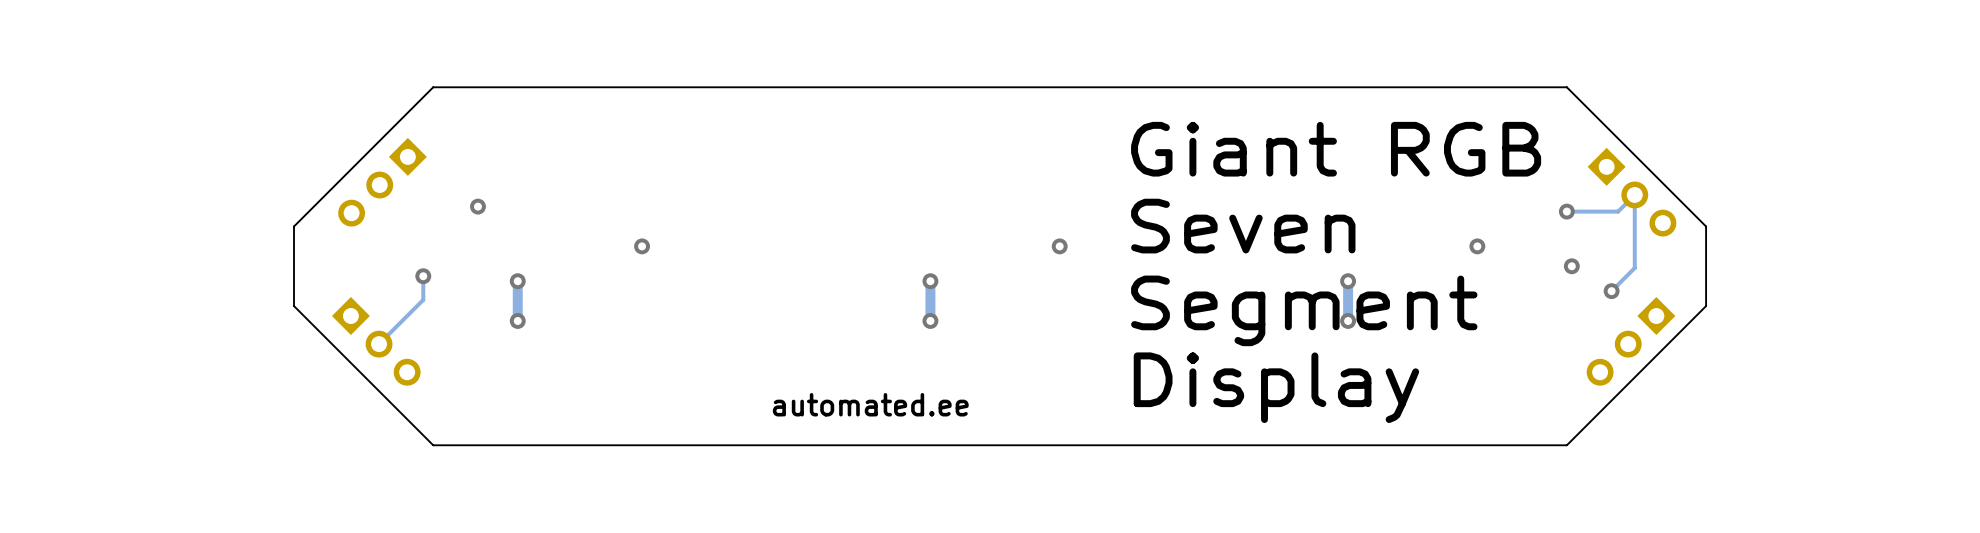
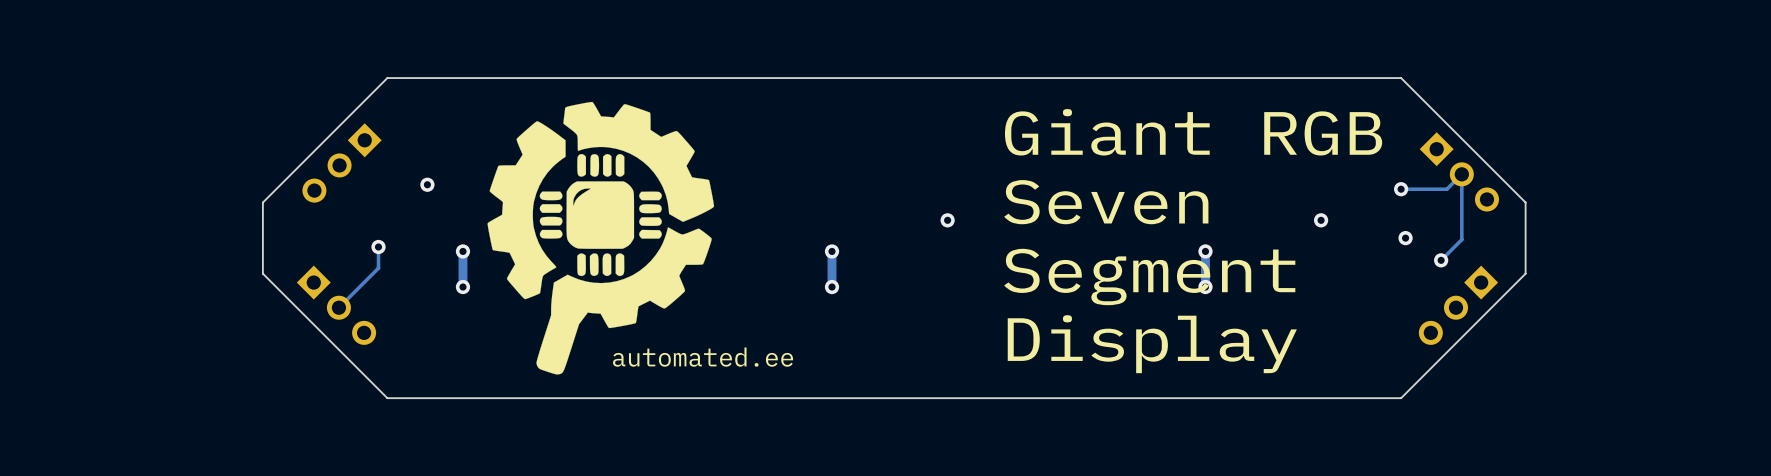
drawing: none -> [487, 101, 715, 375]
text position: automated.ee (870, 404) -> automated.ee (703, 357)

